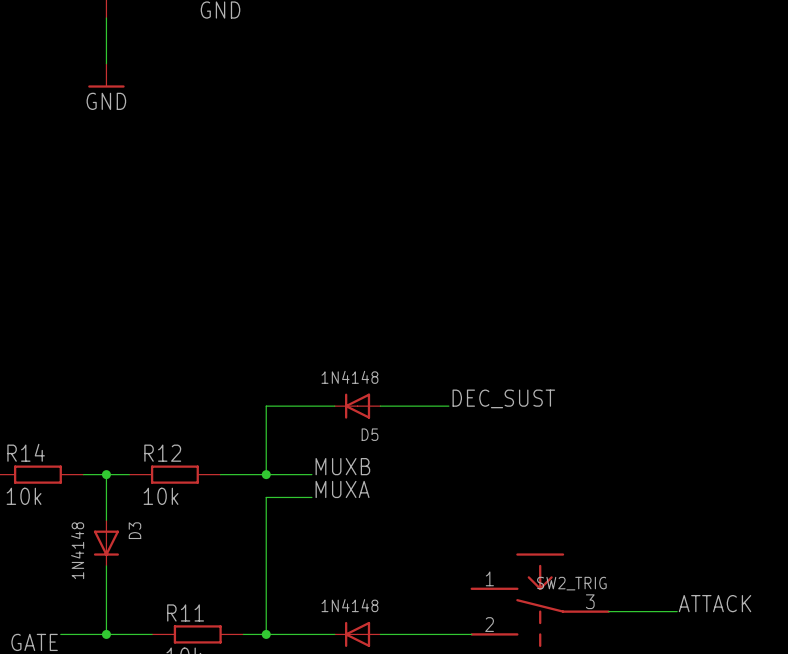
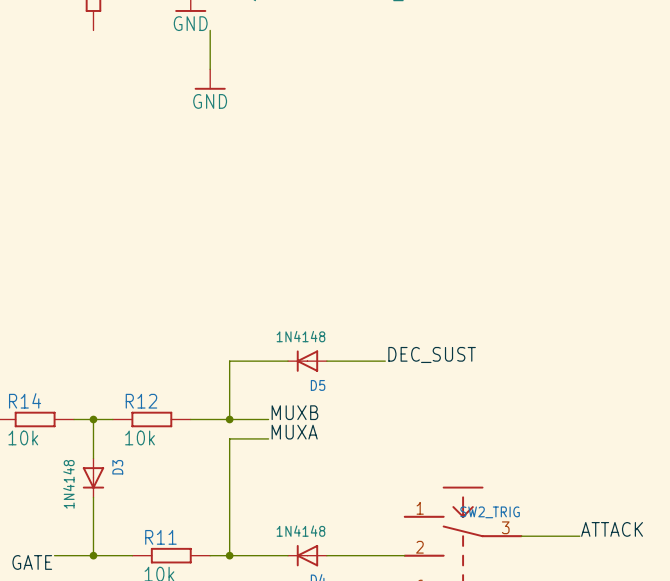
wire: (106, 18) (106, 63) -> (210, 30) (210, 69)
power symbol position: GND (106, 75) -> GND (210, 79)

